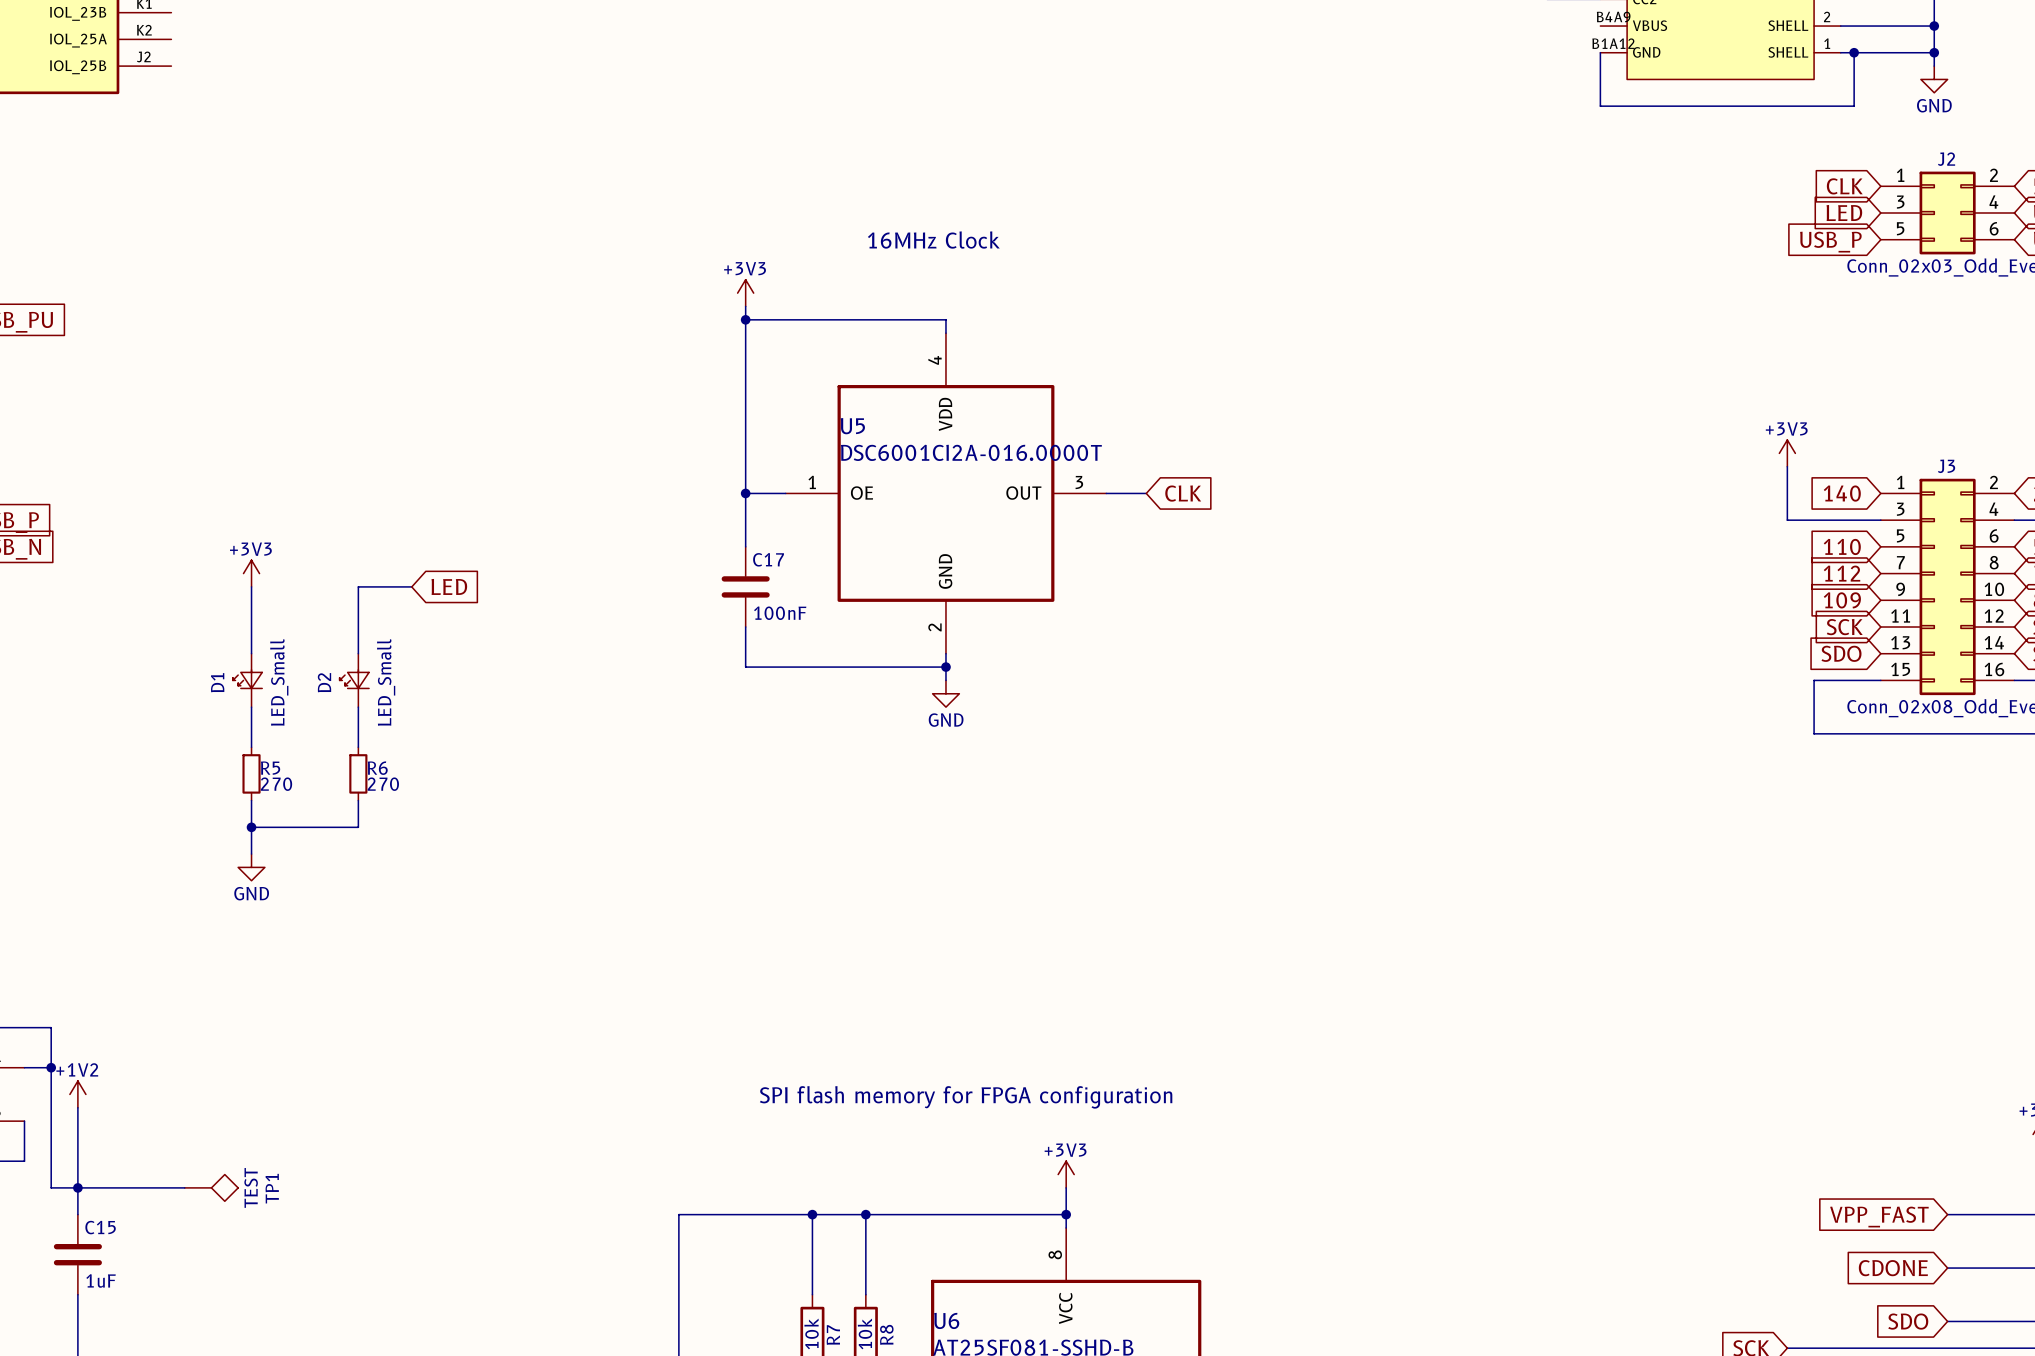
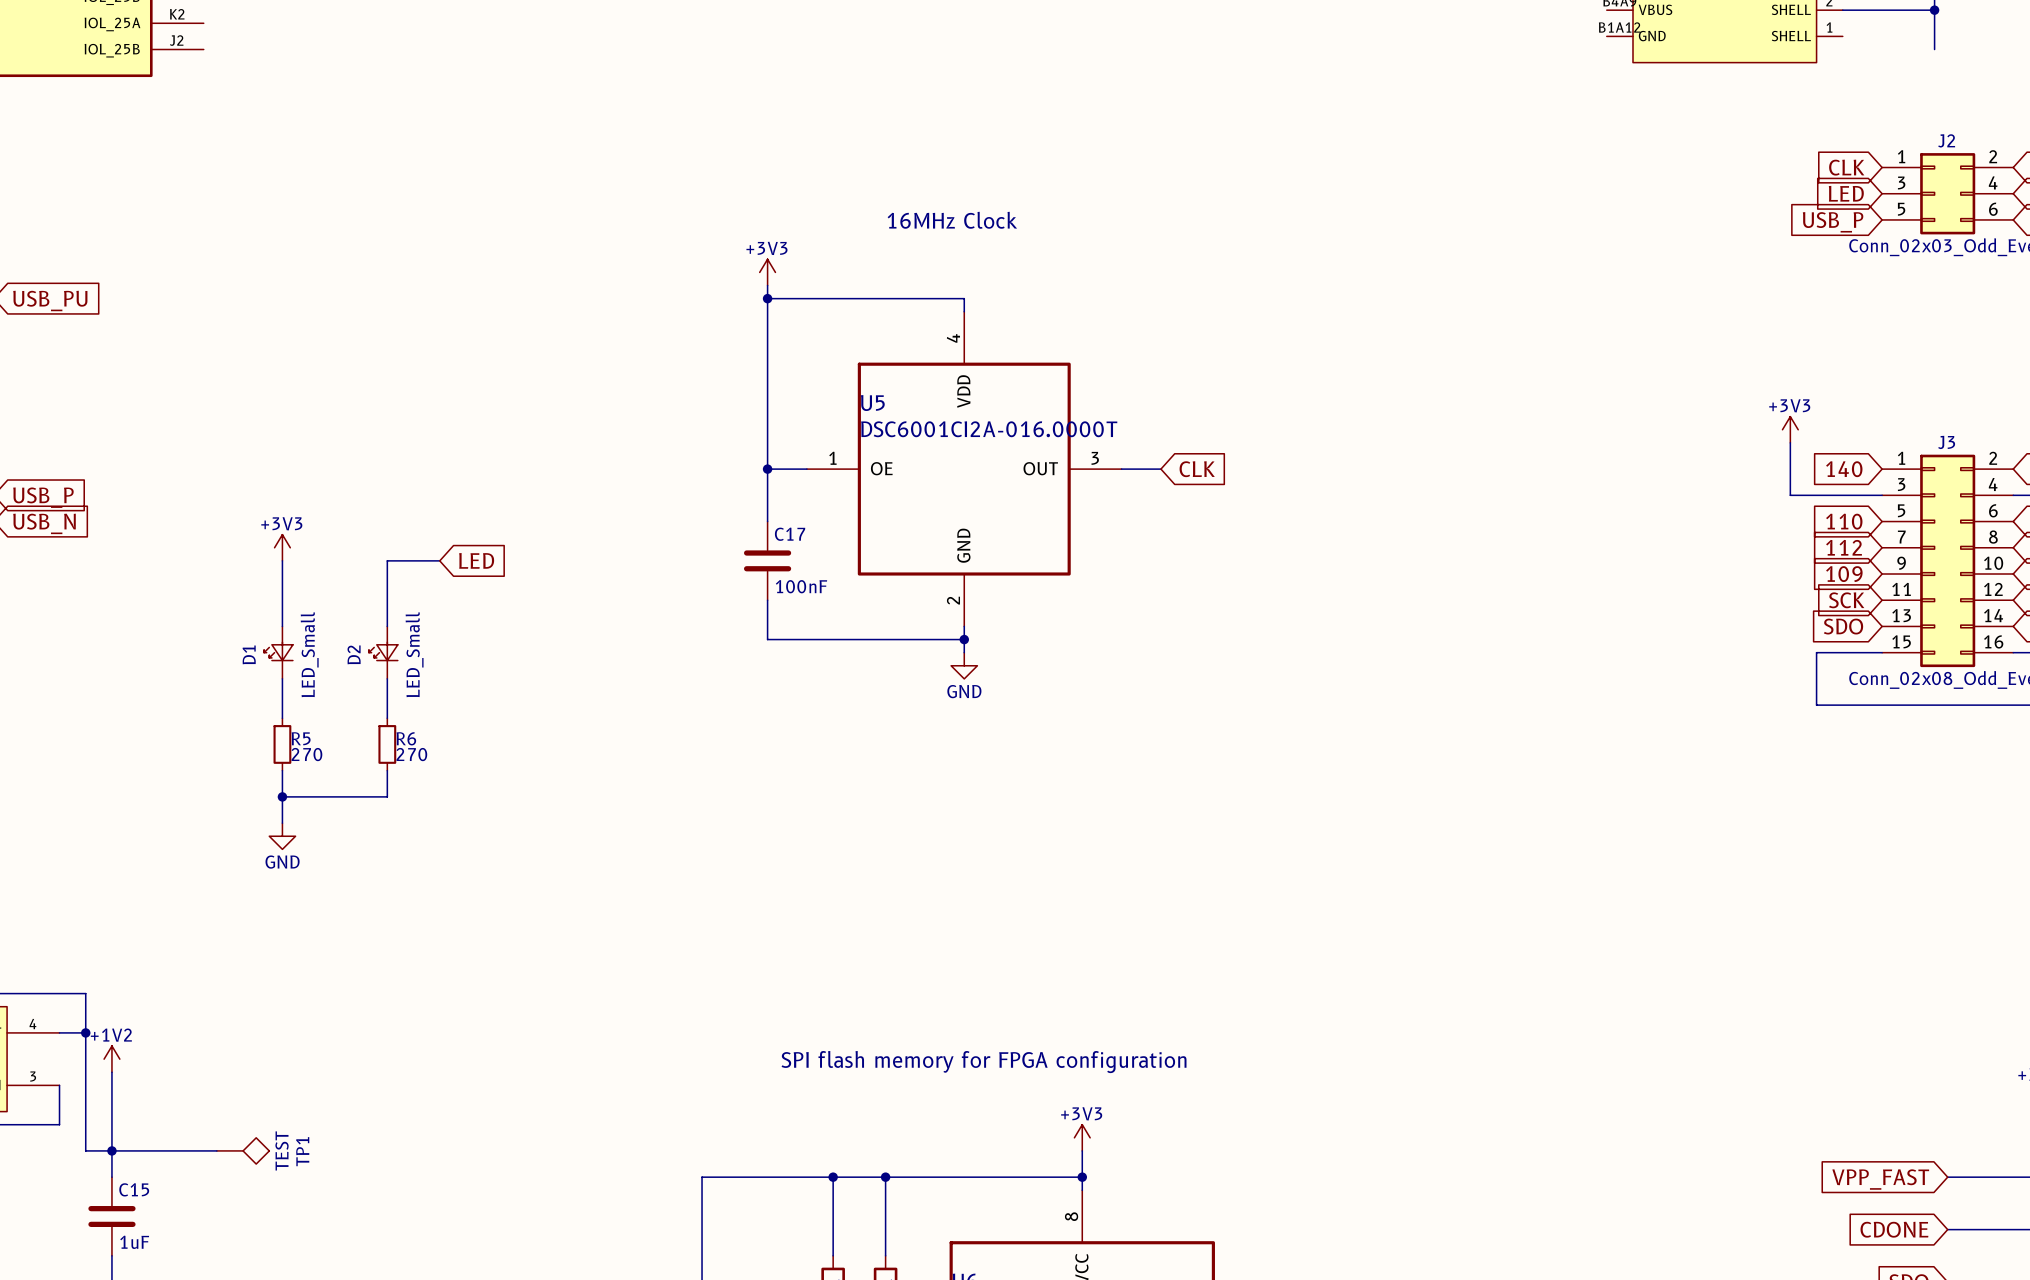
wire: (1600, 52) (1600, 106) (1854, 106) (1854, 52) -> none
wire: (1840, 52) (1934, 52) -> none
junction: (1854, 52) -> none
junction: (1934, 52) -> none
power symbol: GND (1934, 79) -> none

